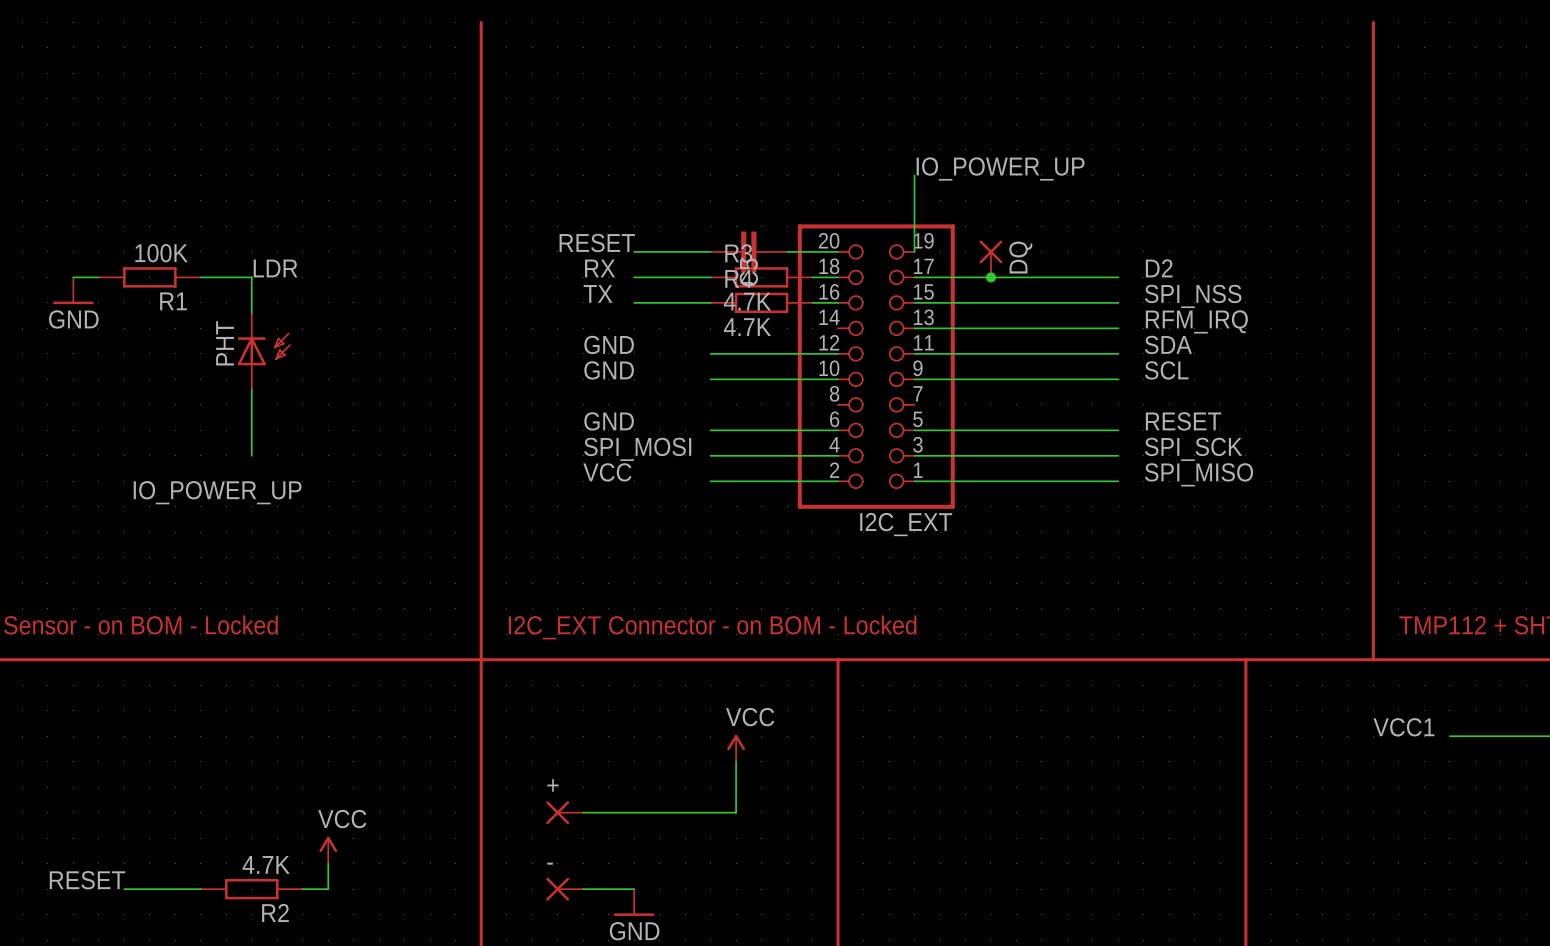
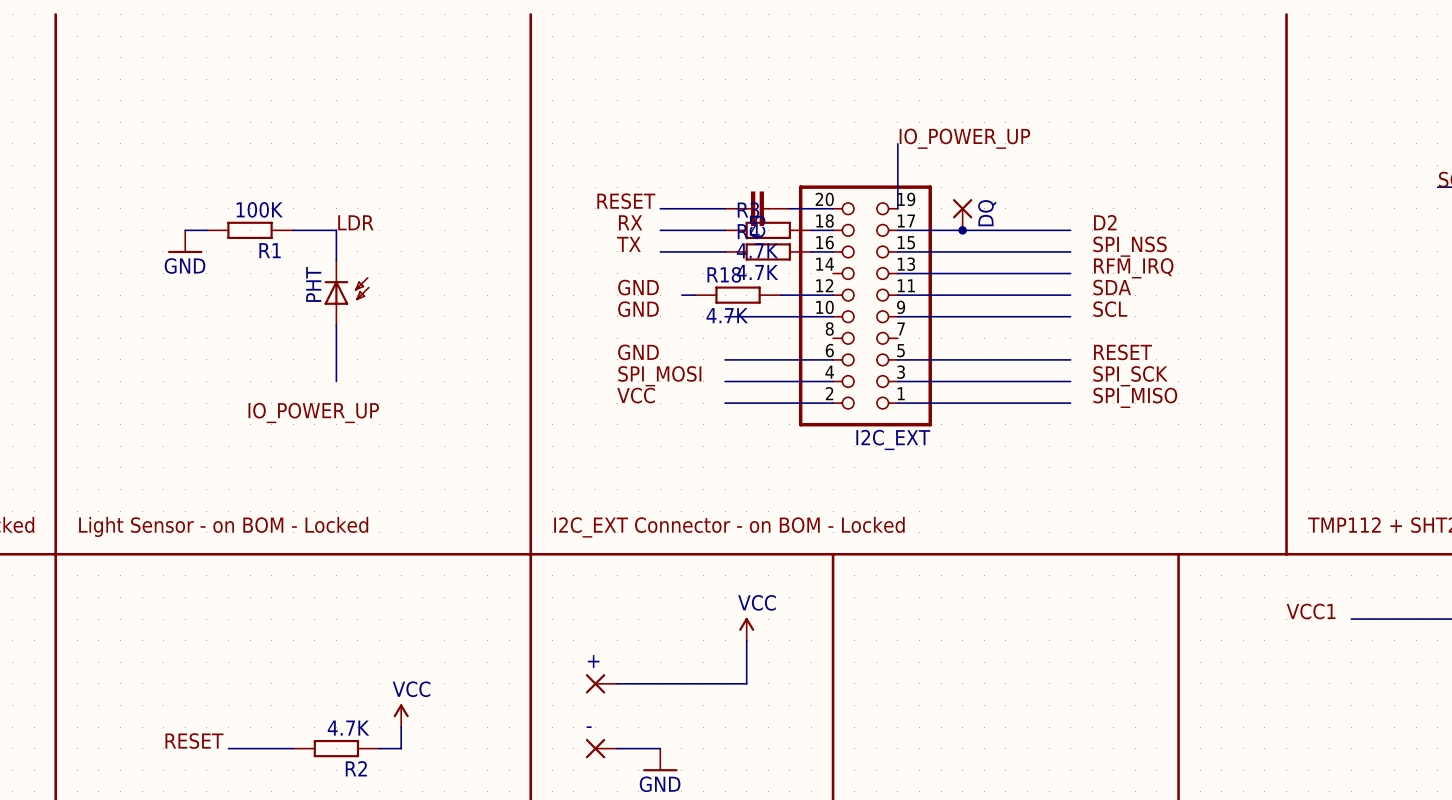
wire: none -> (681, 295) (694, 295)
wire: (710, 353) (776, 353) -> none
R18: none -> 4.7K (738, 295)

